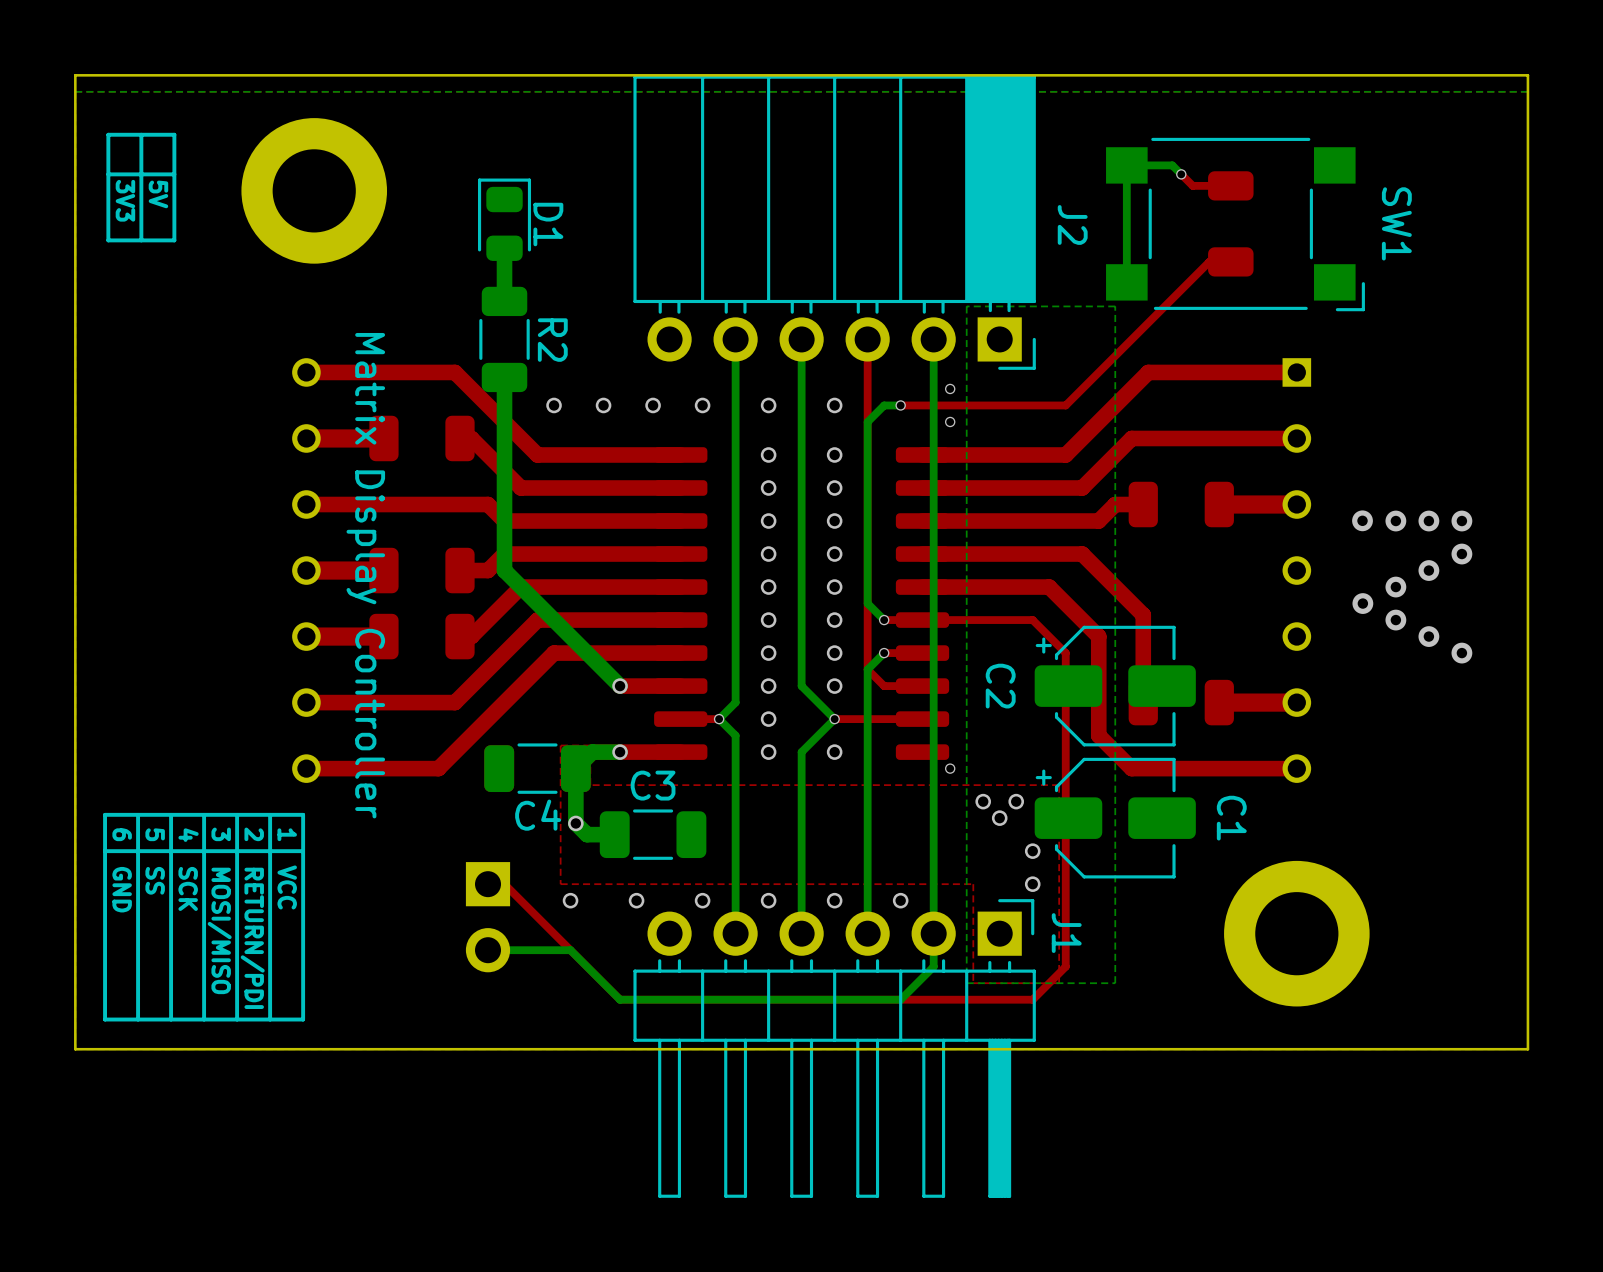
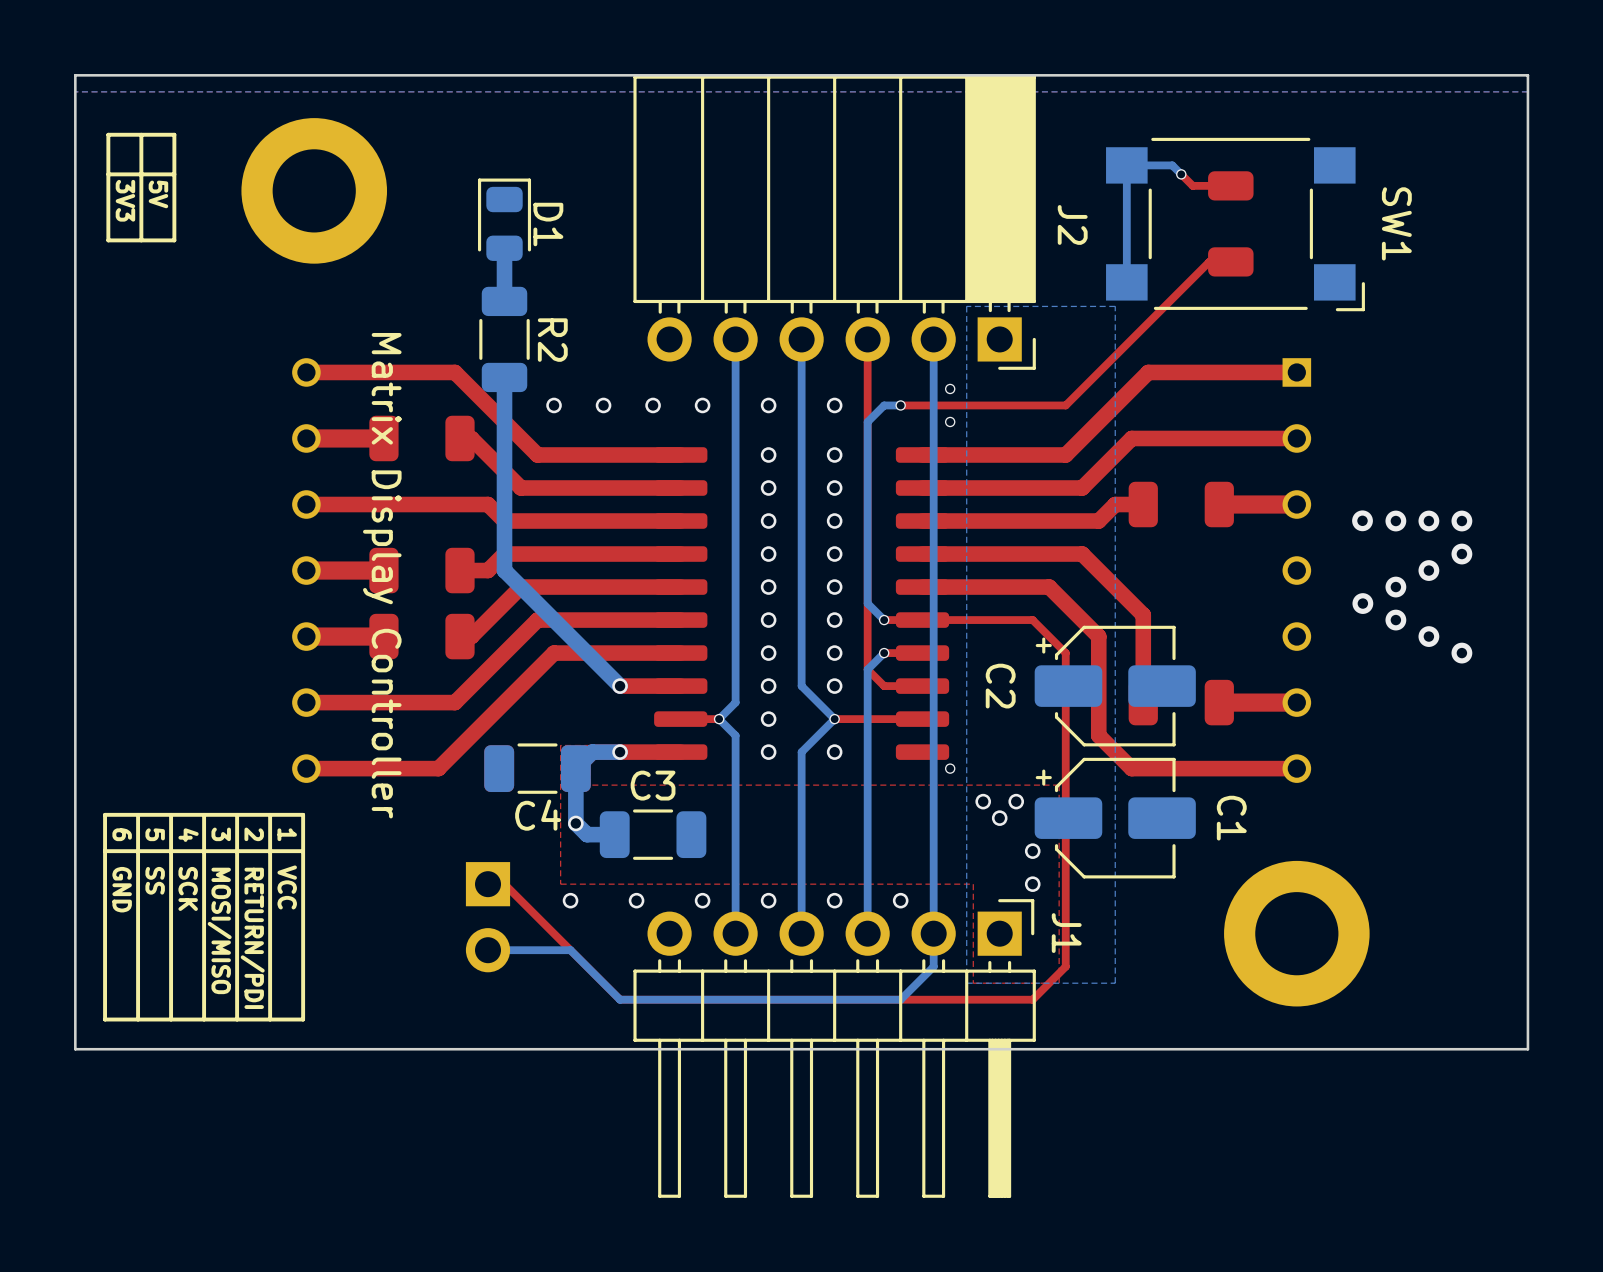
text position: Matrix Display Controller (365, 575) -> Matrix Display Controller (382, 575)

